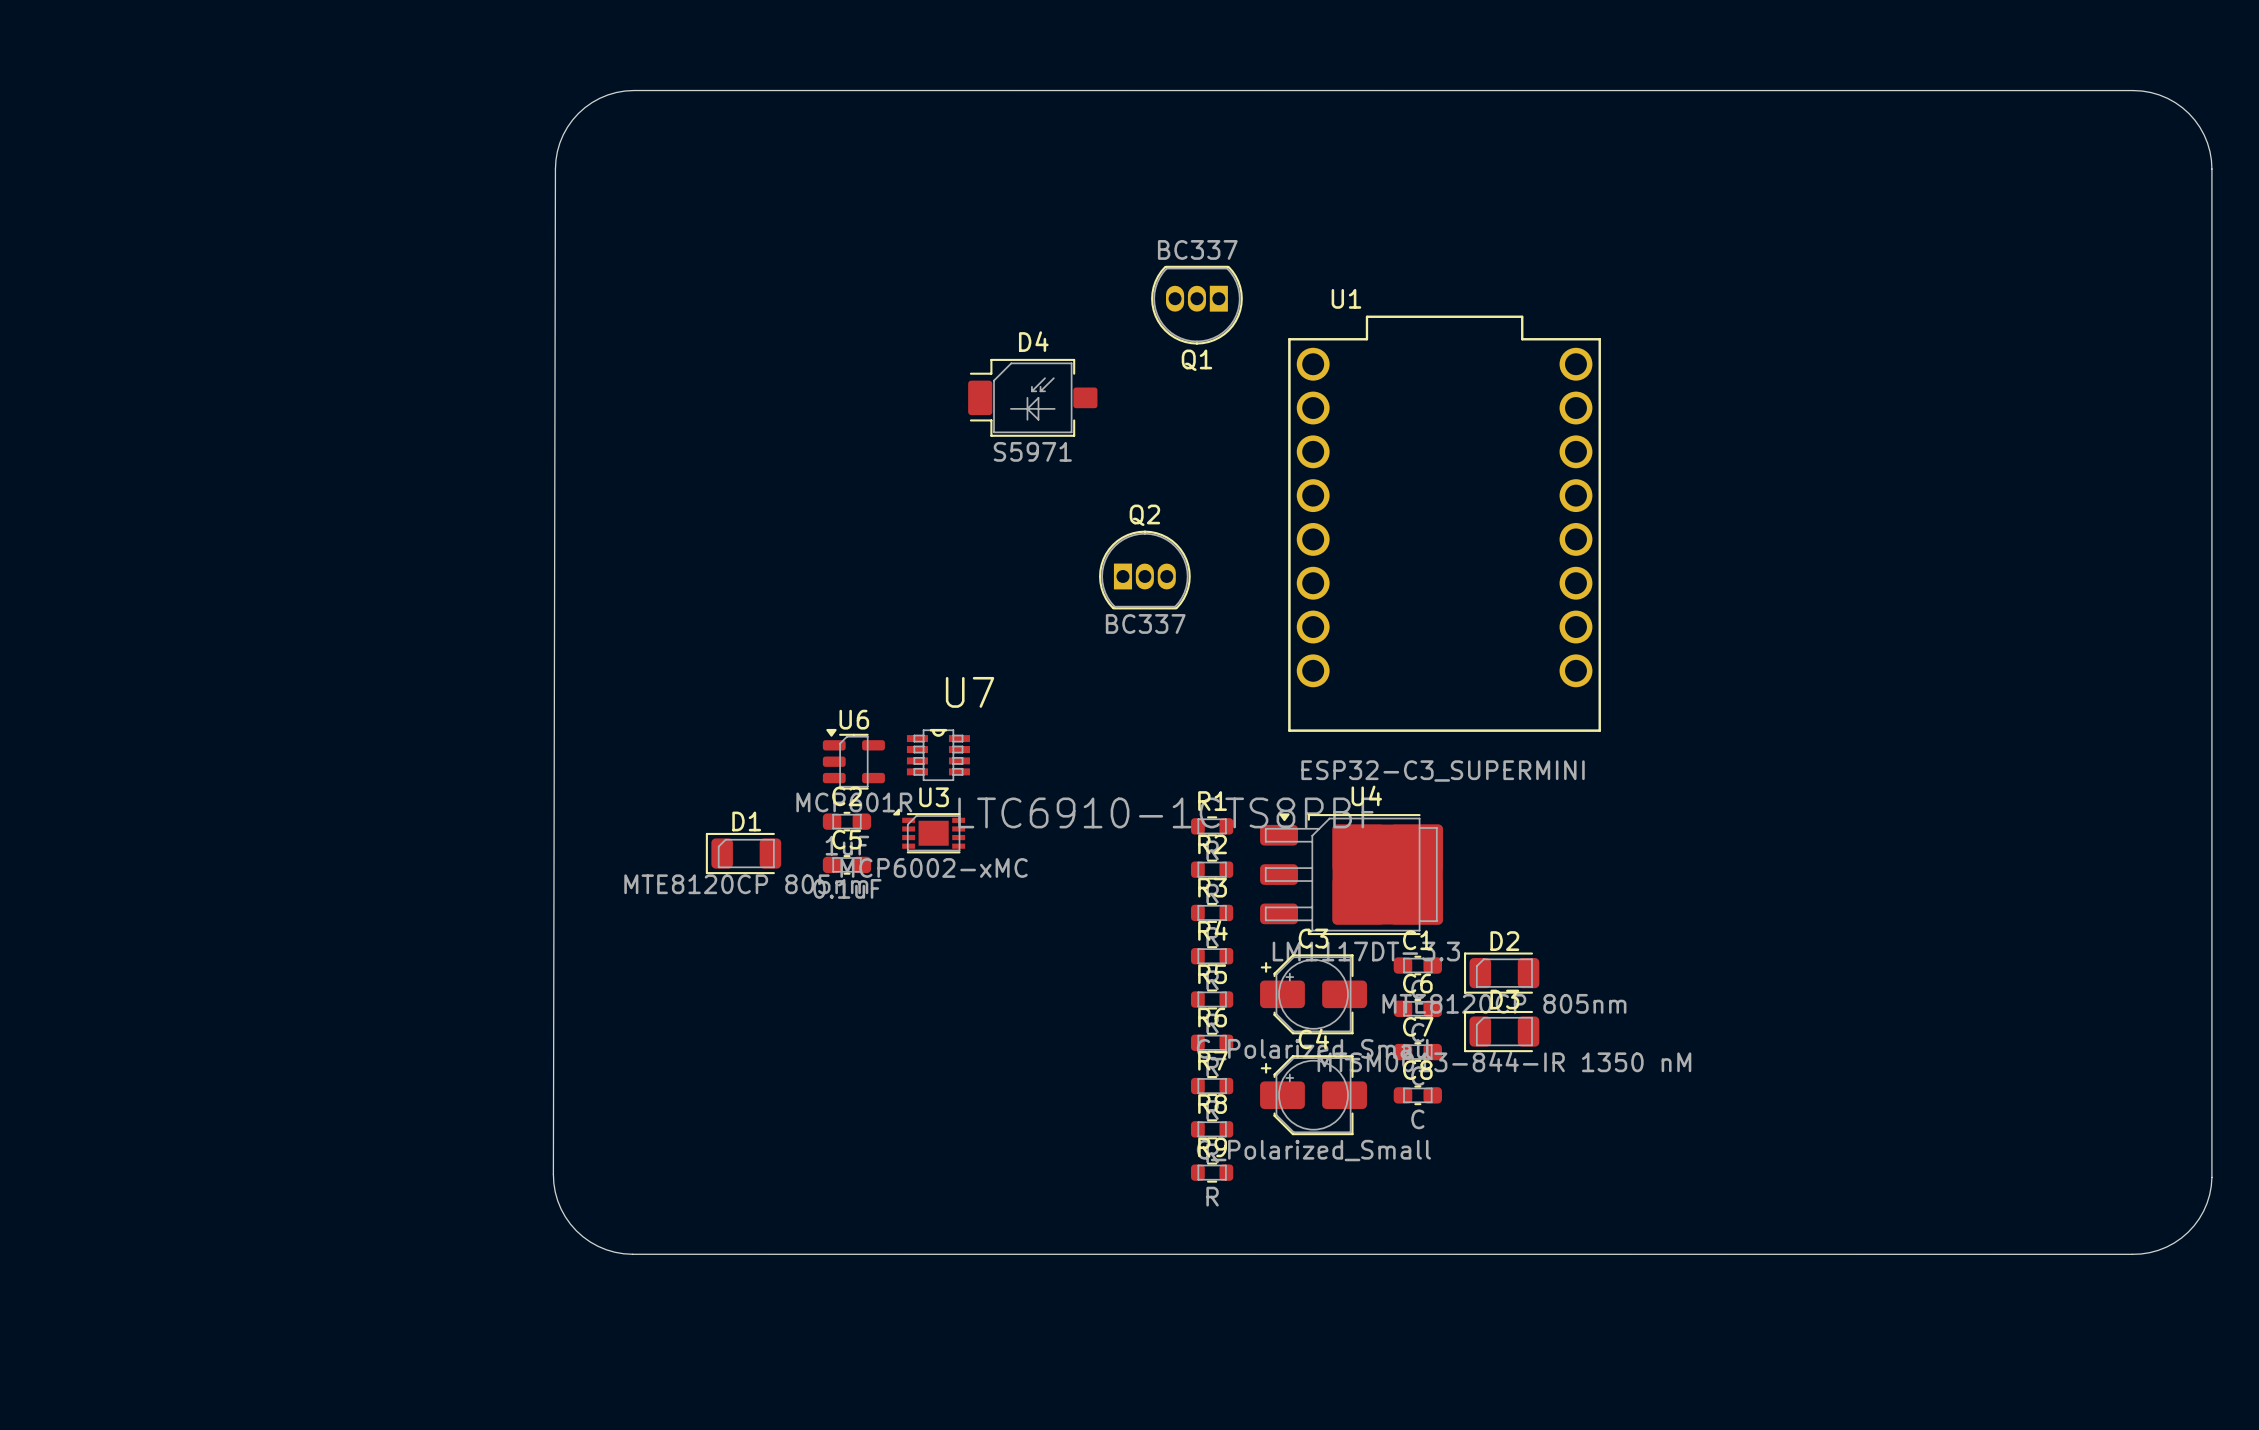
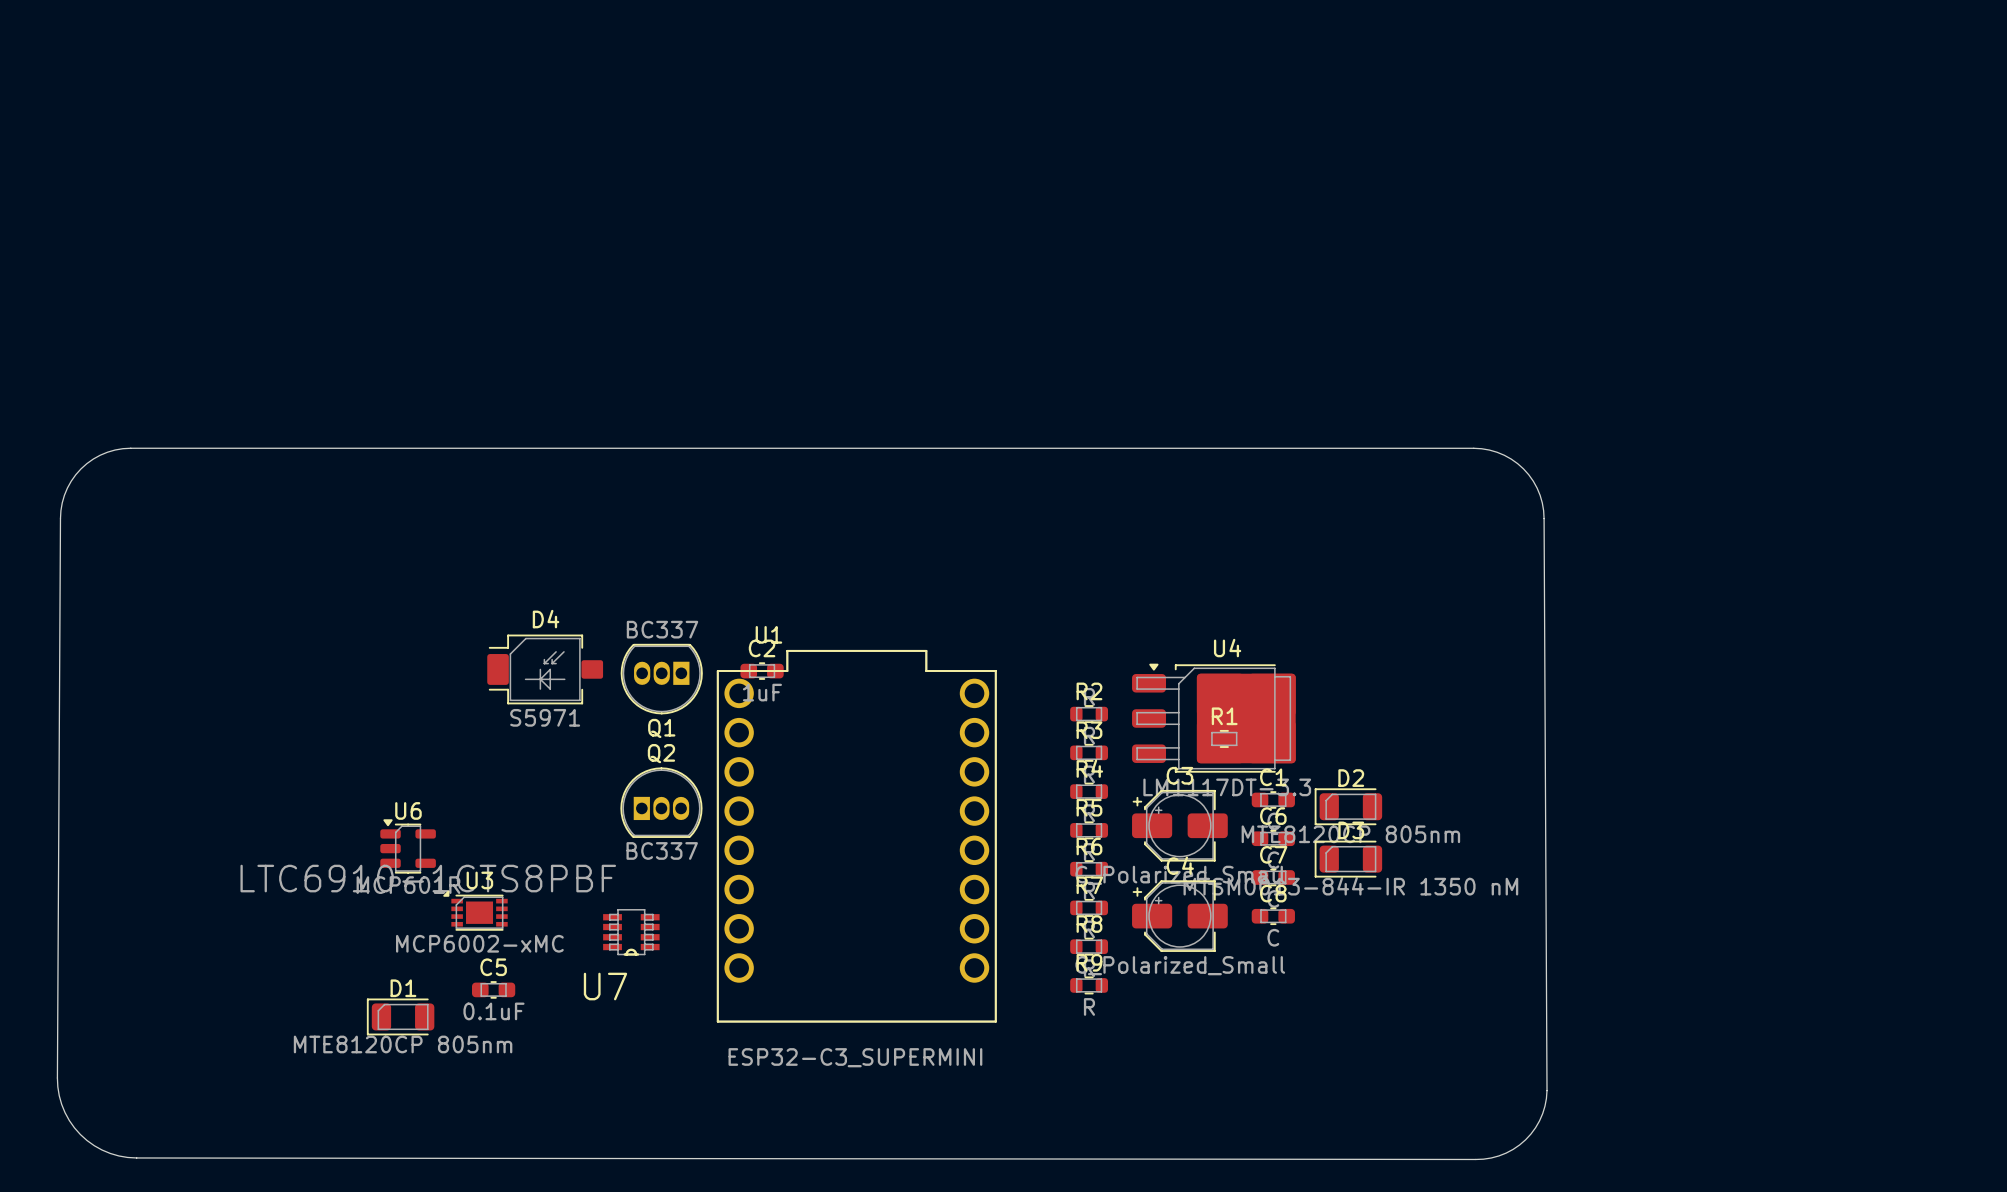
board edge: (633, 90) (2133, 90) (2159, 94) (2182, 107) (2194, 120) (2204, 134) (2209, 151) (2211, 169) (2211, 1177) (2209, 1194) (2199, 1218) (2181, 1238) (2166, 1247) (2149, 1252) (2132, 1254) (632, 1254) (606, 1249) (583, 1236) (570, 1224) (561, 1208) (555, 1192) (553, 1174) (555, 168) (559, 143) (567, 127) (578, 113) (599, 98) (616, 92) (633, 90) -> none
Q1 position: (1196, 305) -> (661, 679)
D4 position: (1032, 397) -> (545, 669)
U1 position: (1444, 523) -> (856, 836)
Q2 position: (1144, 570) -> (661, 802)
board edge: none -> (130, 448) (1473, 448) (1489, 450) (1504, 455) (1517, 463) (1533, 481) (1540, 495) (1544, 518) (1547, 1090) (1544, 1106) (1539, 1120) (1530, 1134) (1513, 1149) (1491, 1157) (1475, 1159) (136, 1157) (118, 1155) (102, 1150) (87, 1140) (74, 1127) (65, 1112) (57, 1086) (60, 518) (62, 502) (67, 488) (81, 468) (100, 455) (115, 450) (130, 448)
U7 rotation: 0° (938, 754) -> 180° (631, 932)
U7 position: (938, 754) -> (631, 932)
U6 position: (853, 759) -> (408, 846)
R1 position: (1212, 826) -> (1224, 738)
U3 position: (929, 831) -> (475, 910)
D1 position: (743, 853) -> (400, 1016)
C5 position: (846, 864) -> (493, 989)

